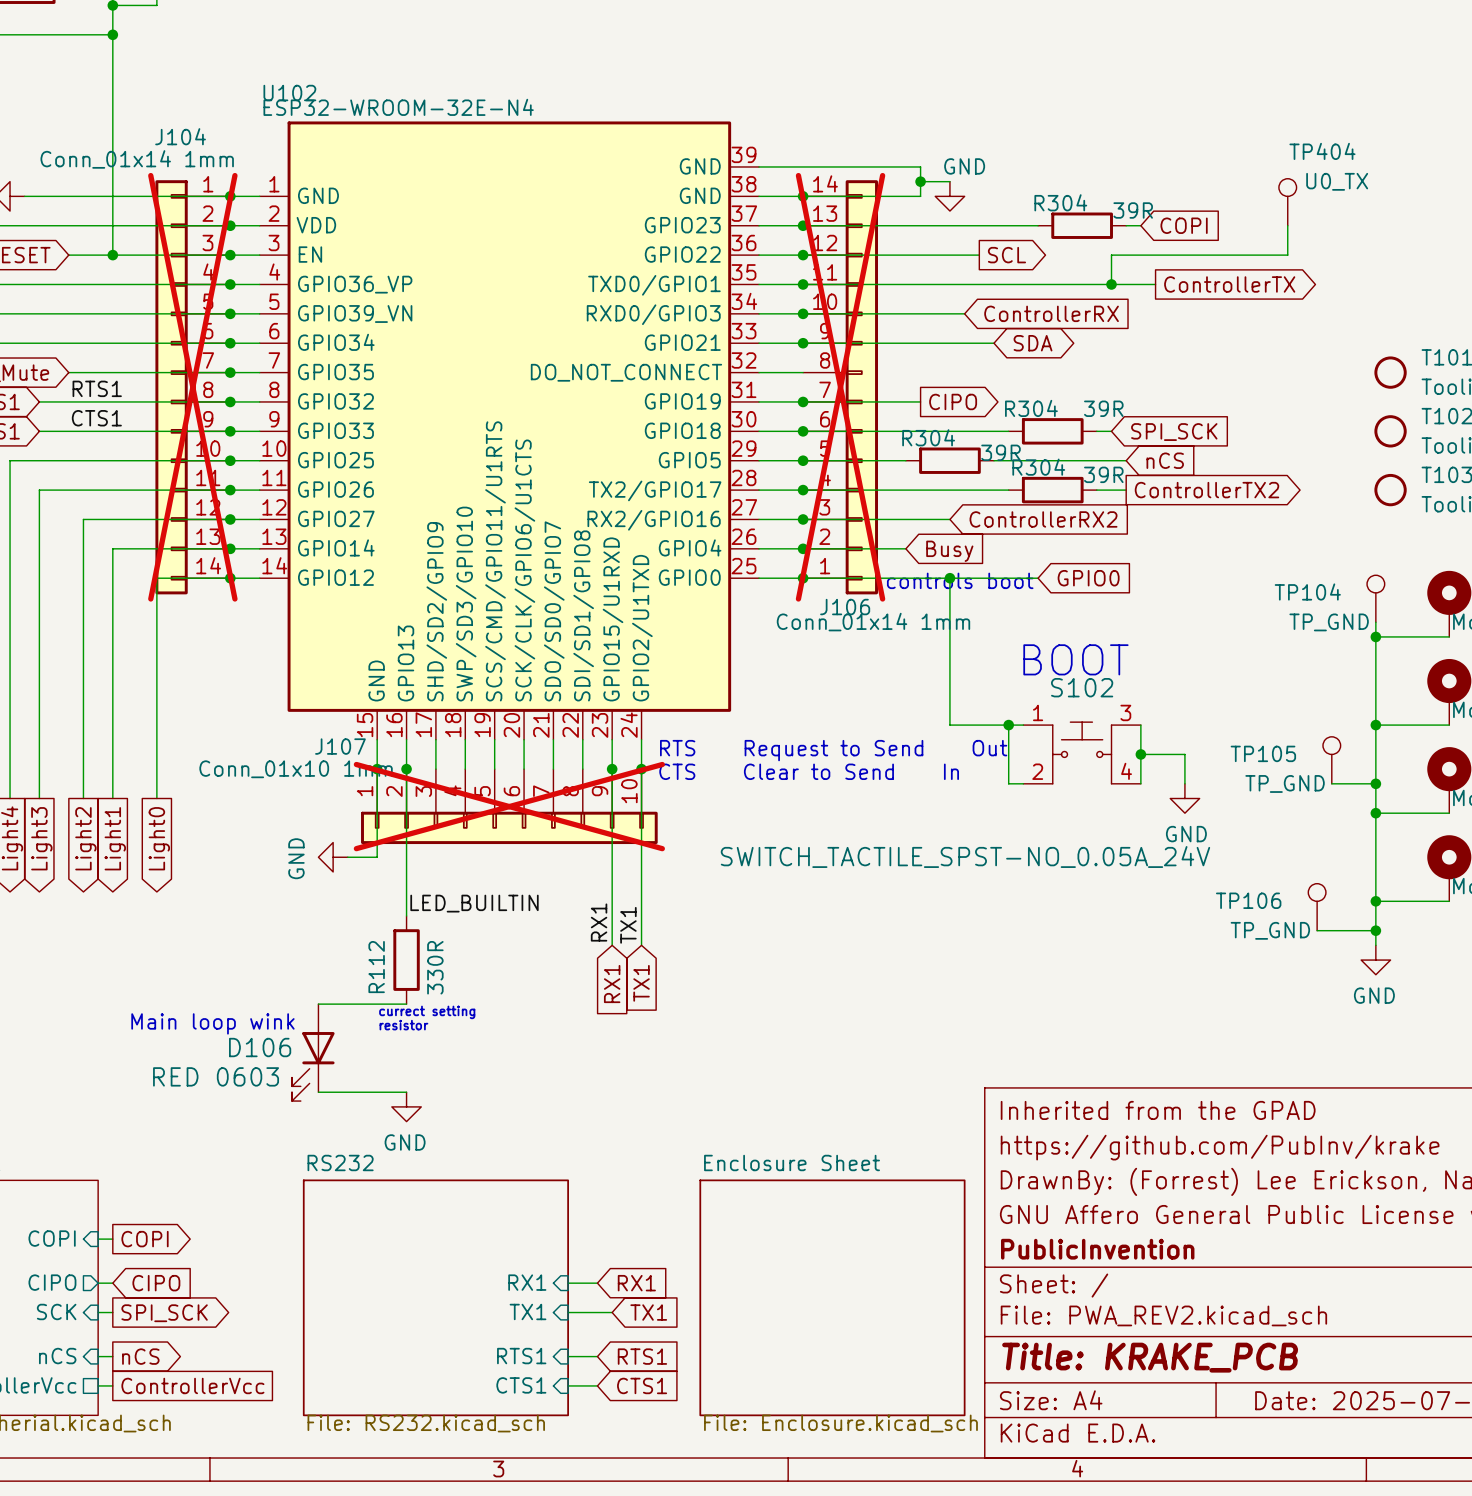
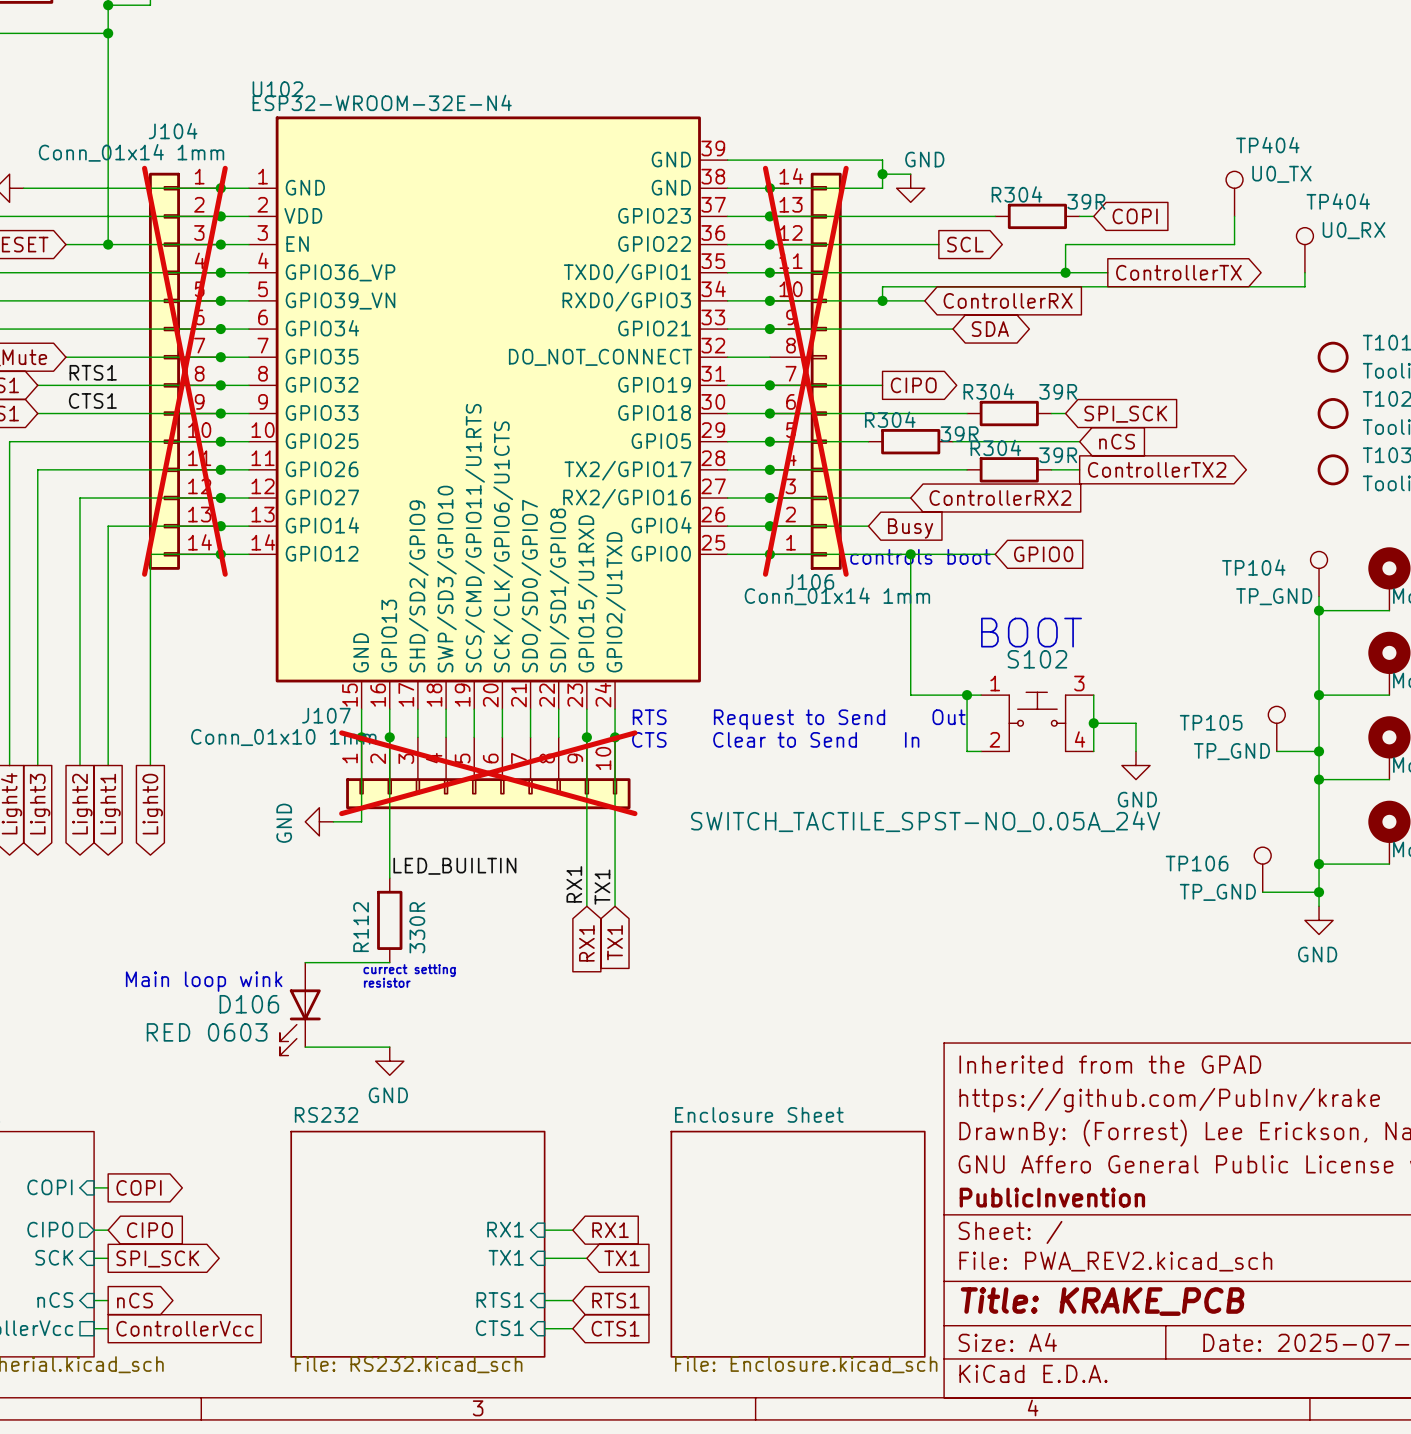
TP404: none -> U0_RX (1304, 250)
wire: none -> (1304, 272) (1304, 286) (882, 286) (882, 300)
junction: none -> (882, 300)

